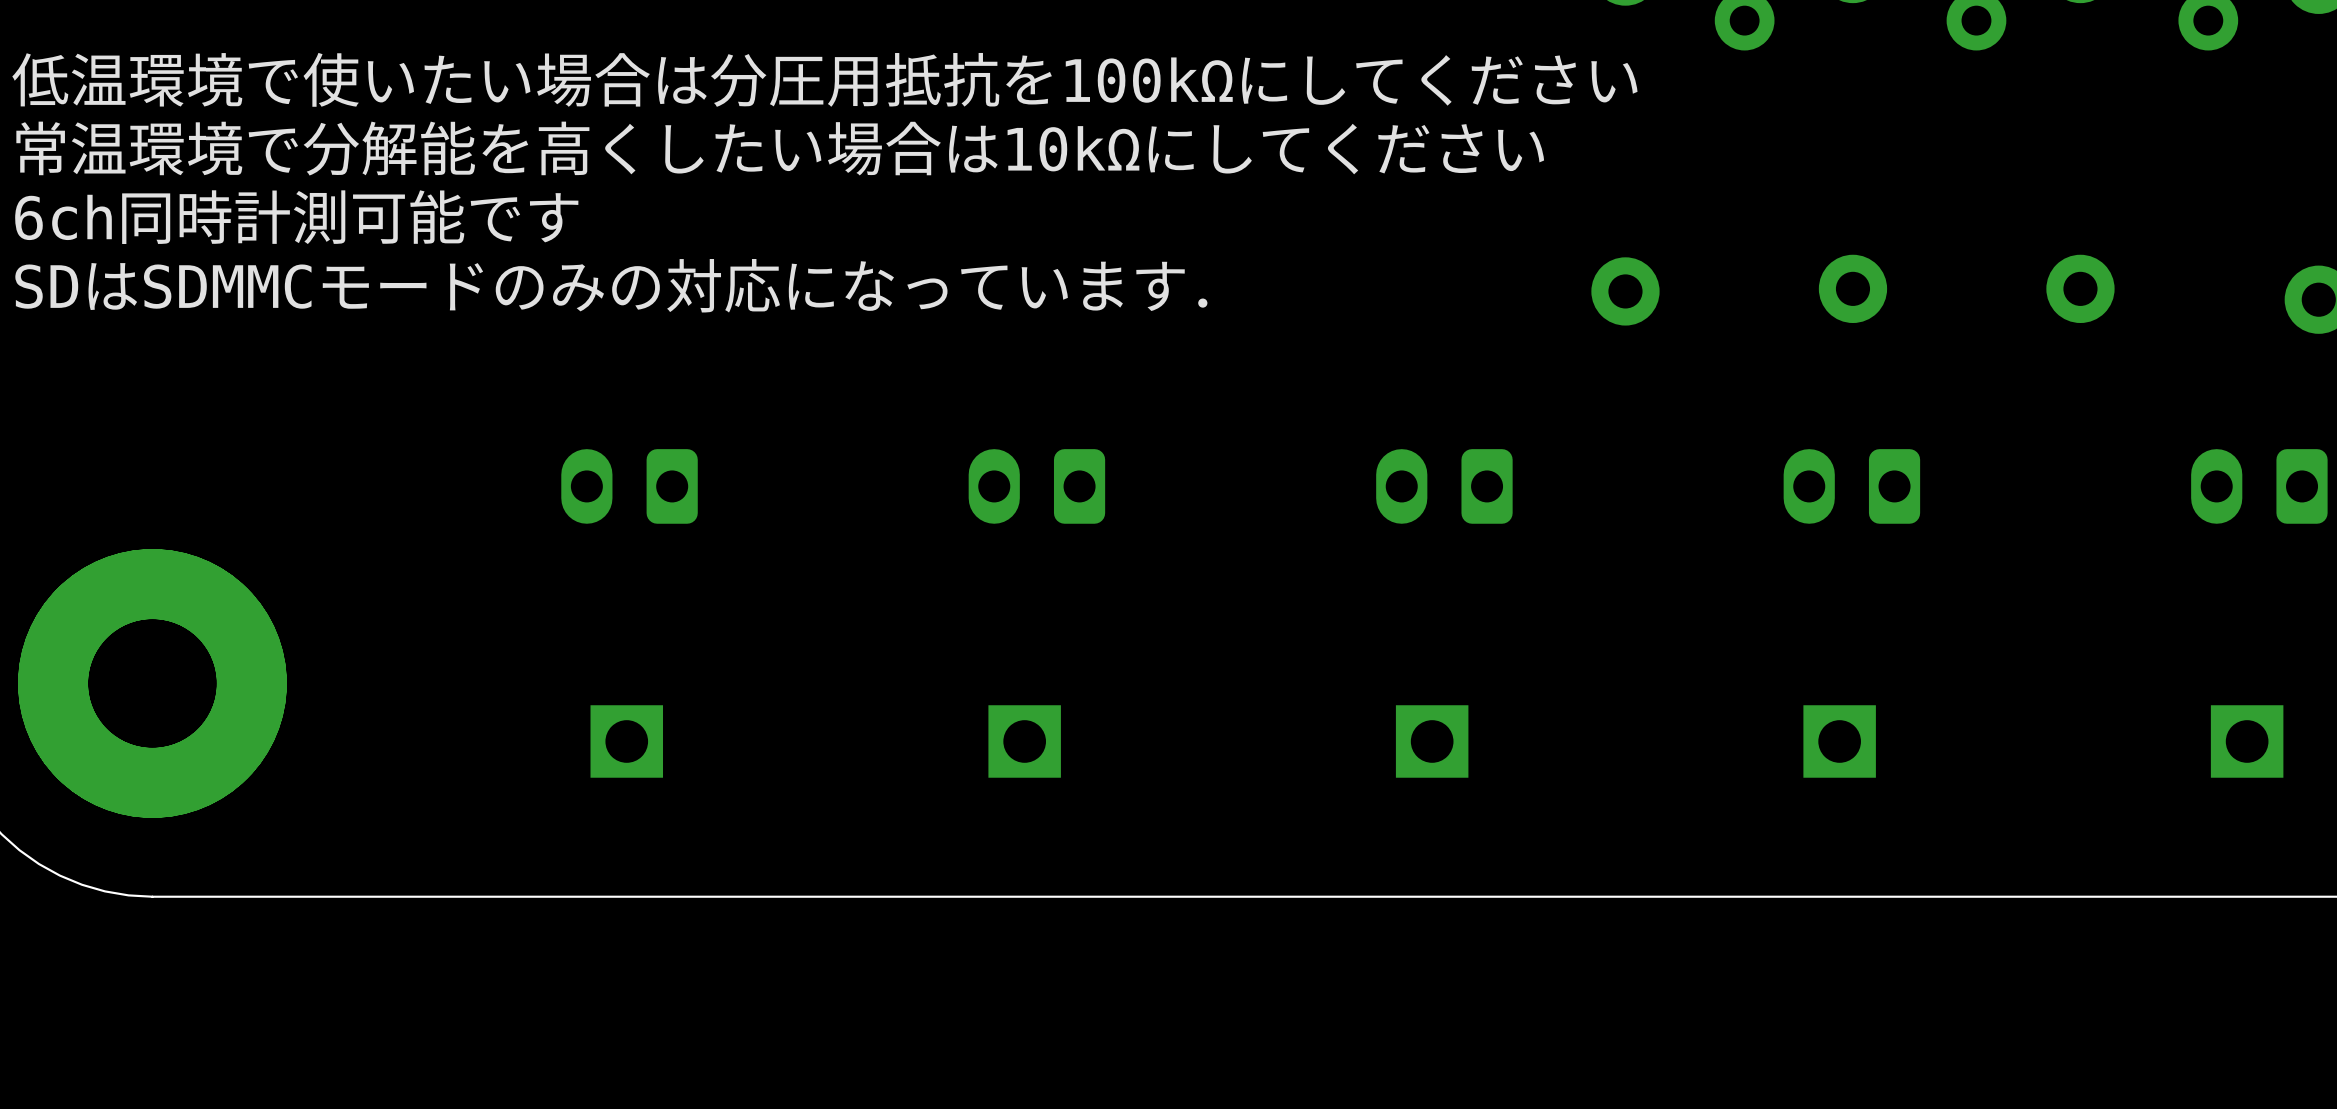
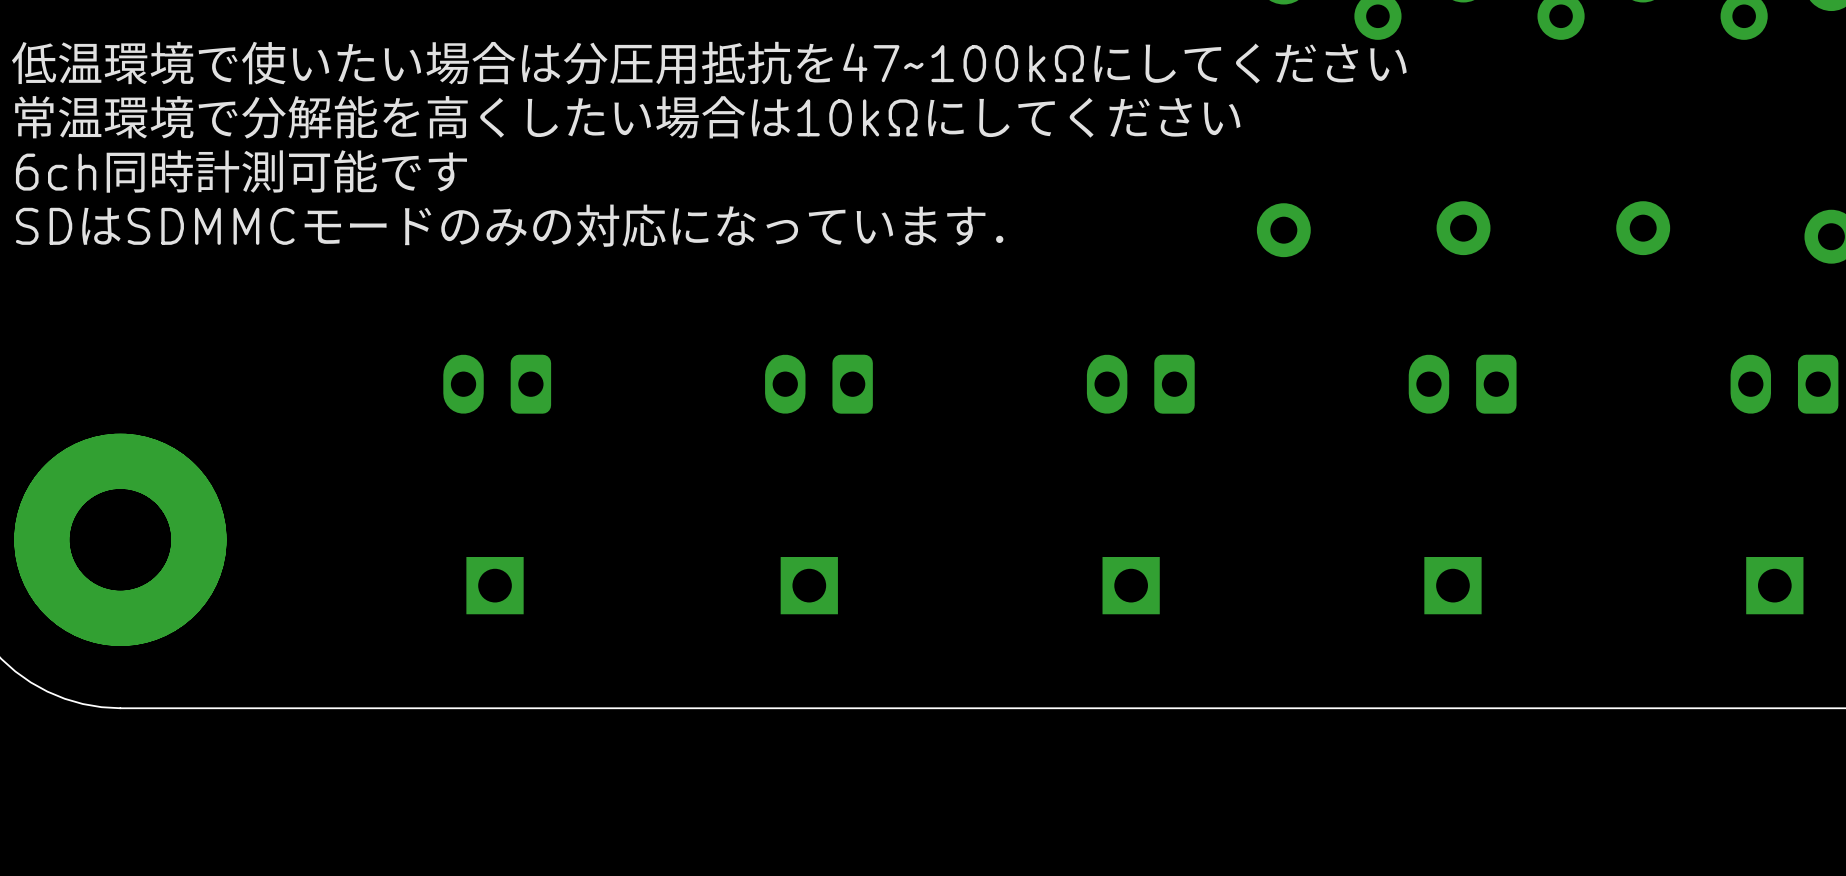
text: 低温環境で使いたい場合は分圧用抵抗を100kΩにしてください (824, 79) -> 低温環境で使いたい場合は分圧用抵抗を47~100kΩにしてください (709, 63)

